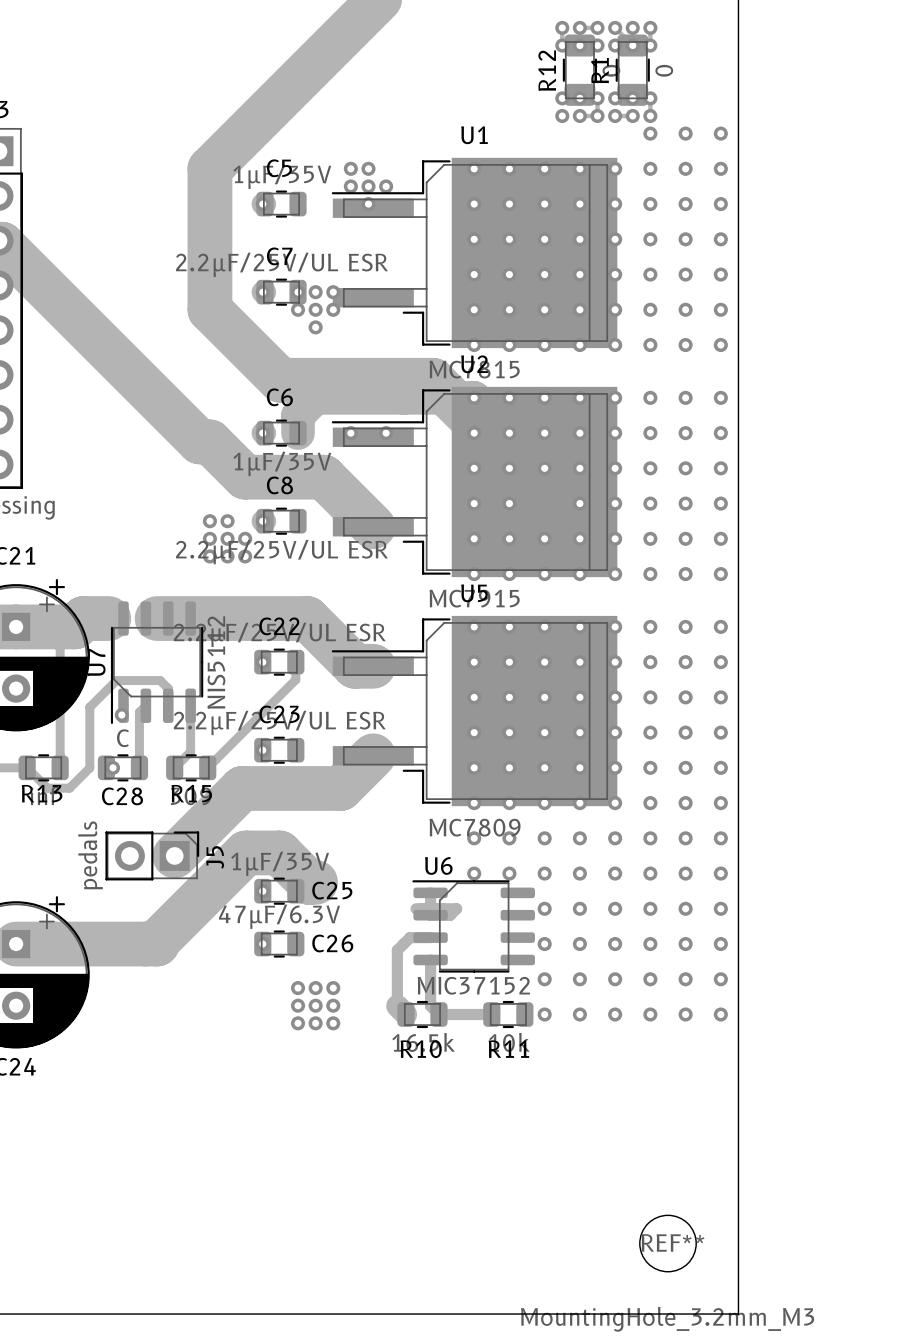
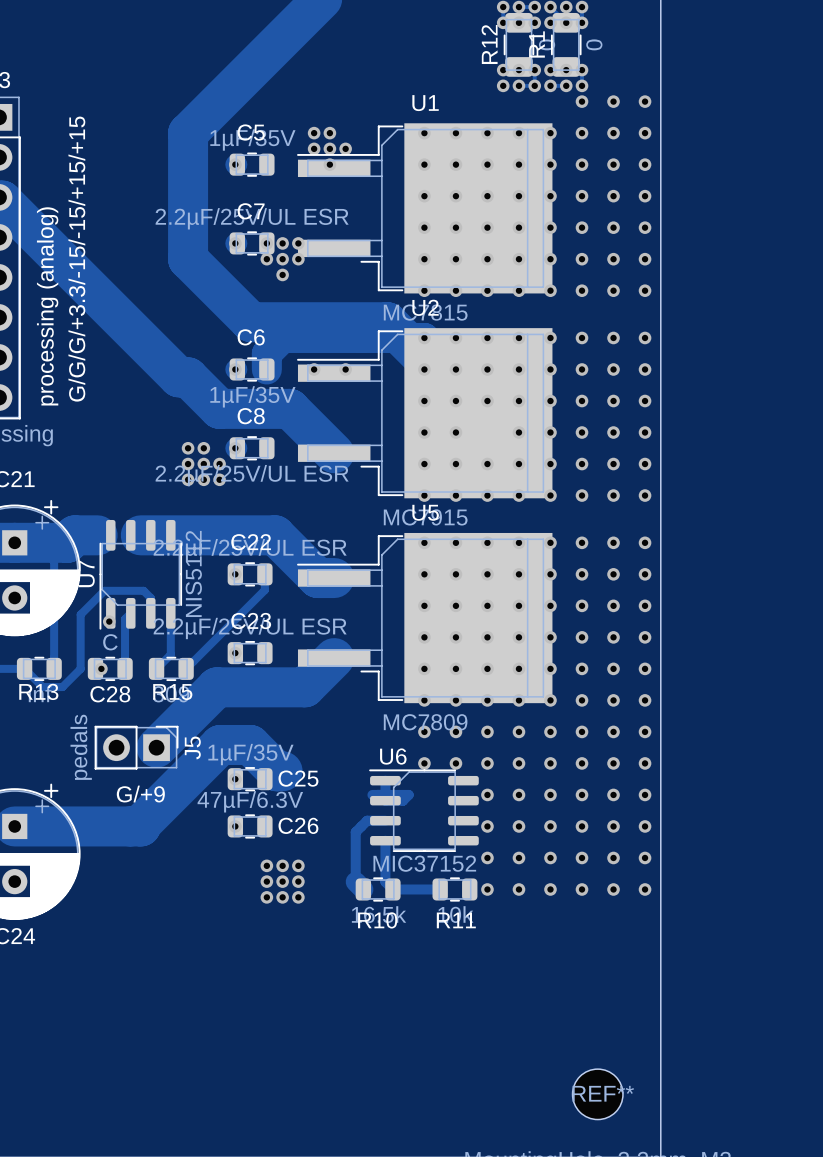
text: none -> G/G/G/+3.3/-15/-15/+15/+15 (76, 259)
text: none -> processing (analog) (47, 306)
text: none -> G/+9 (140, 794)

